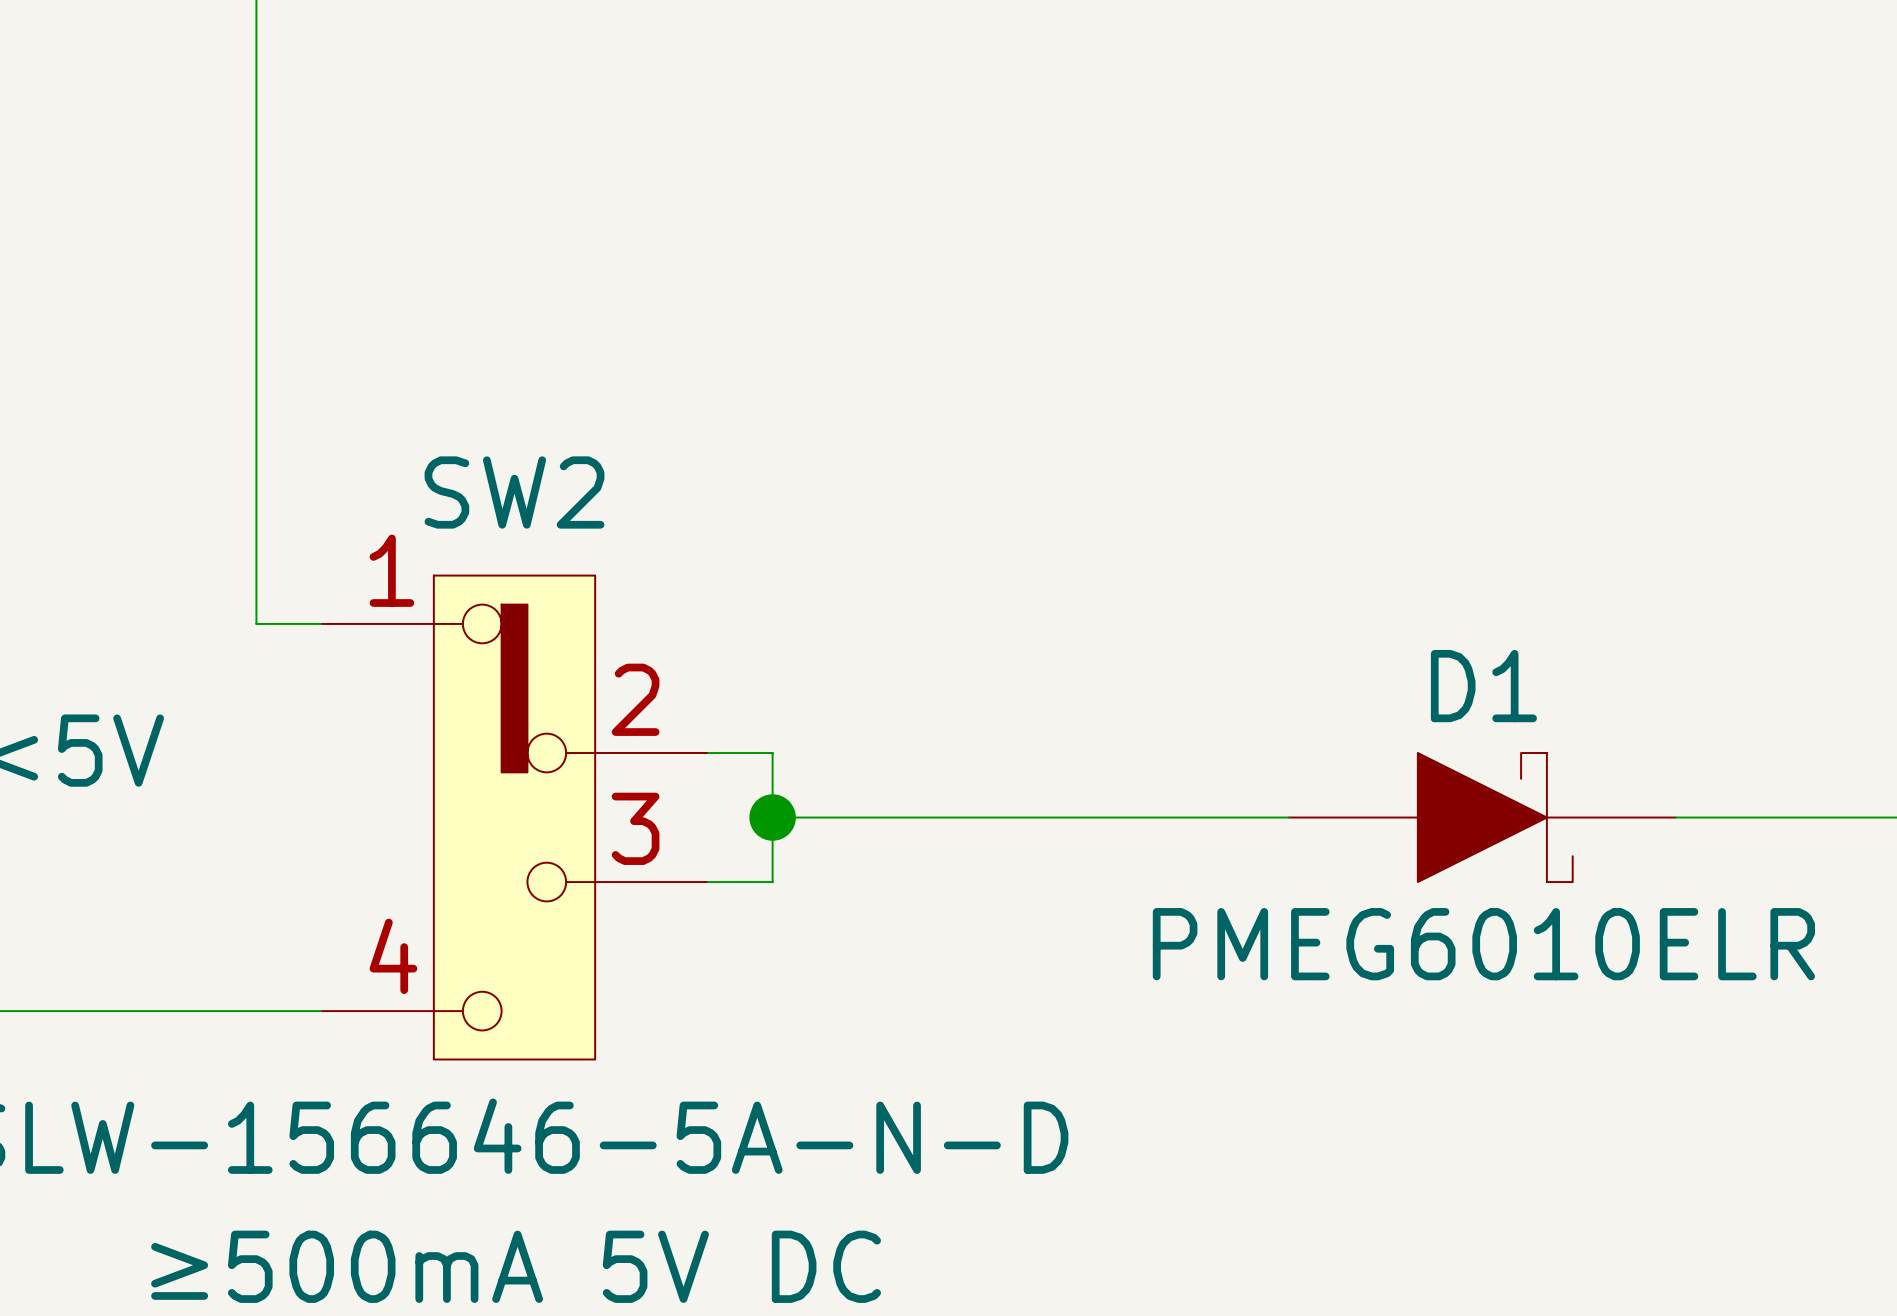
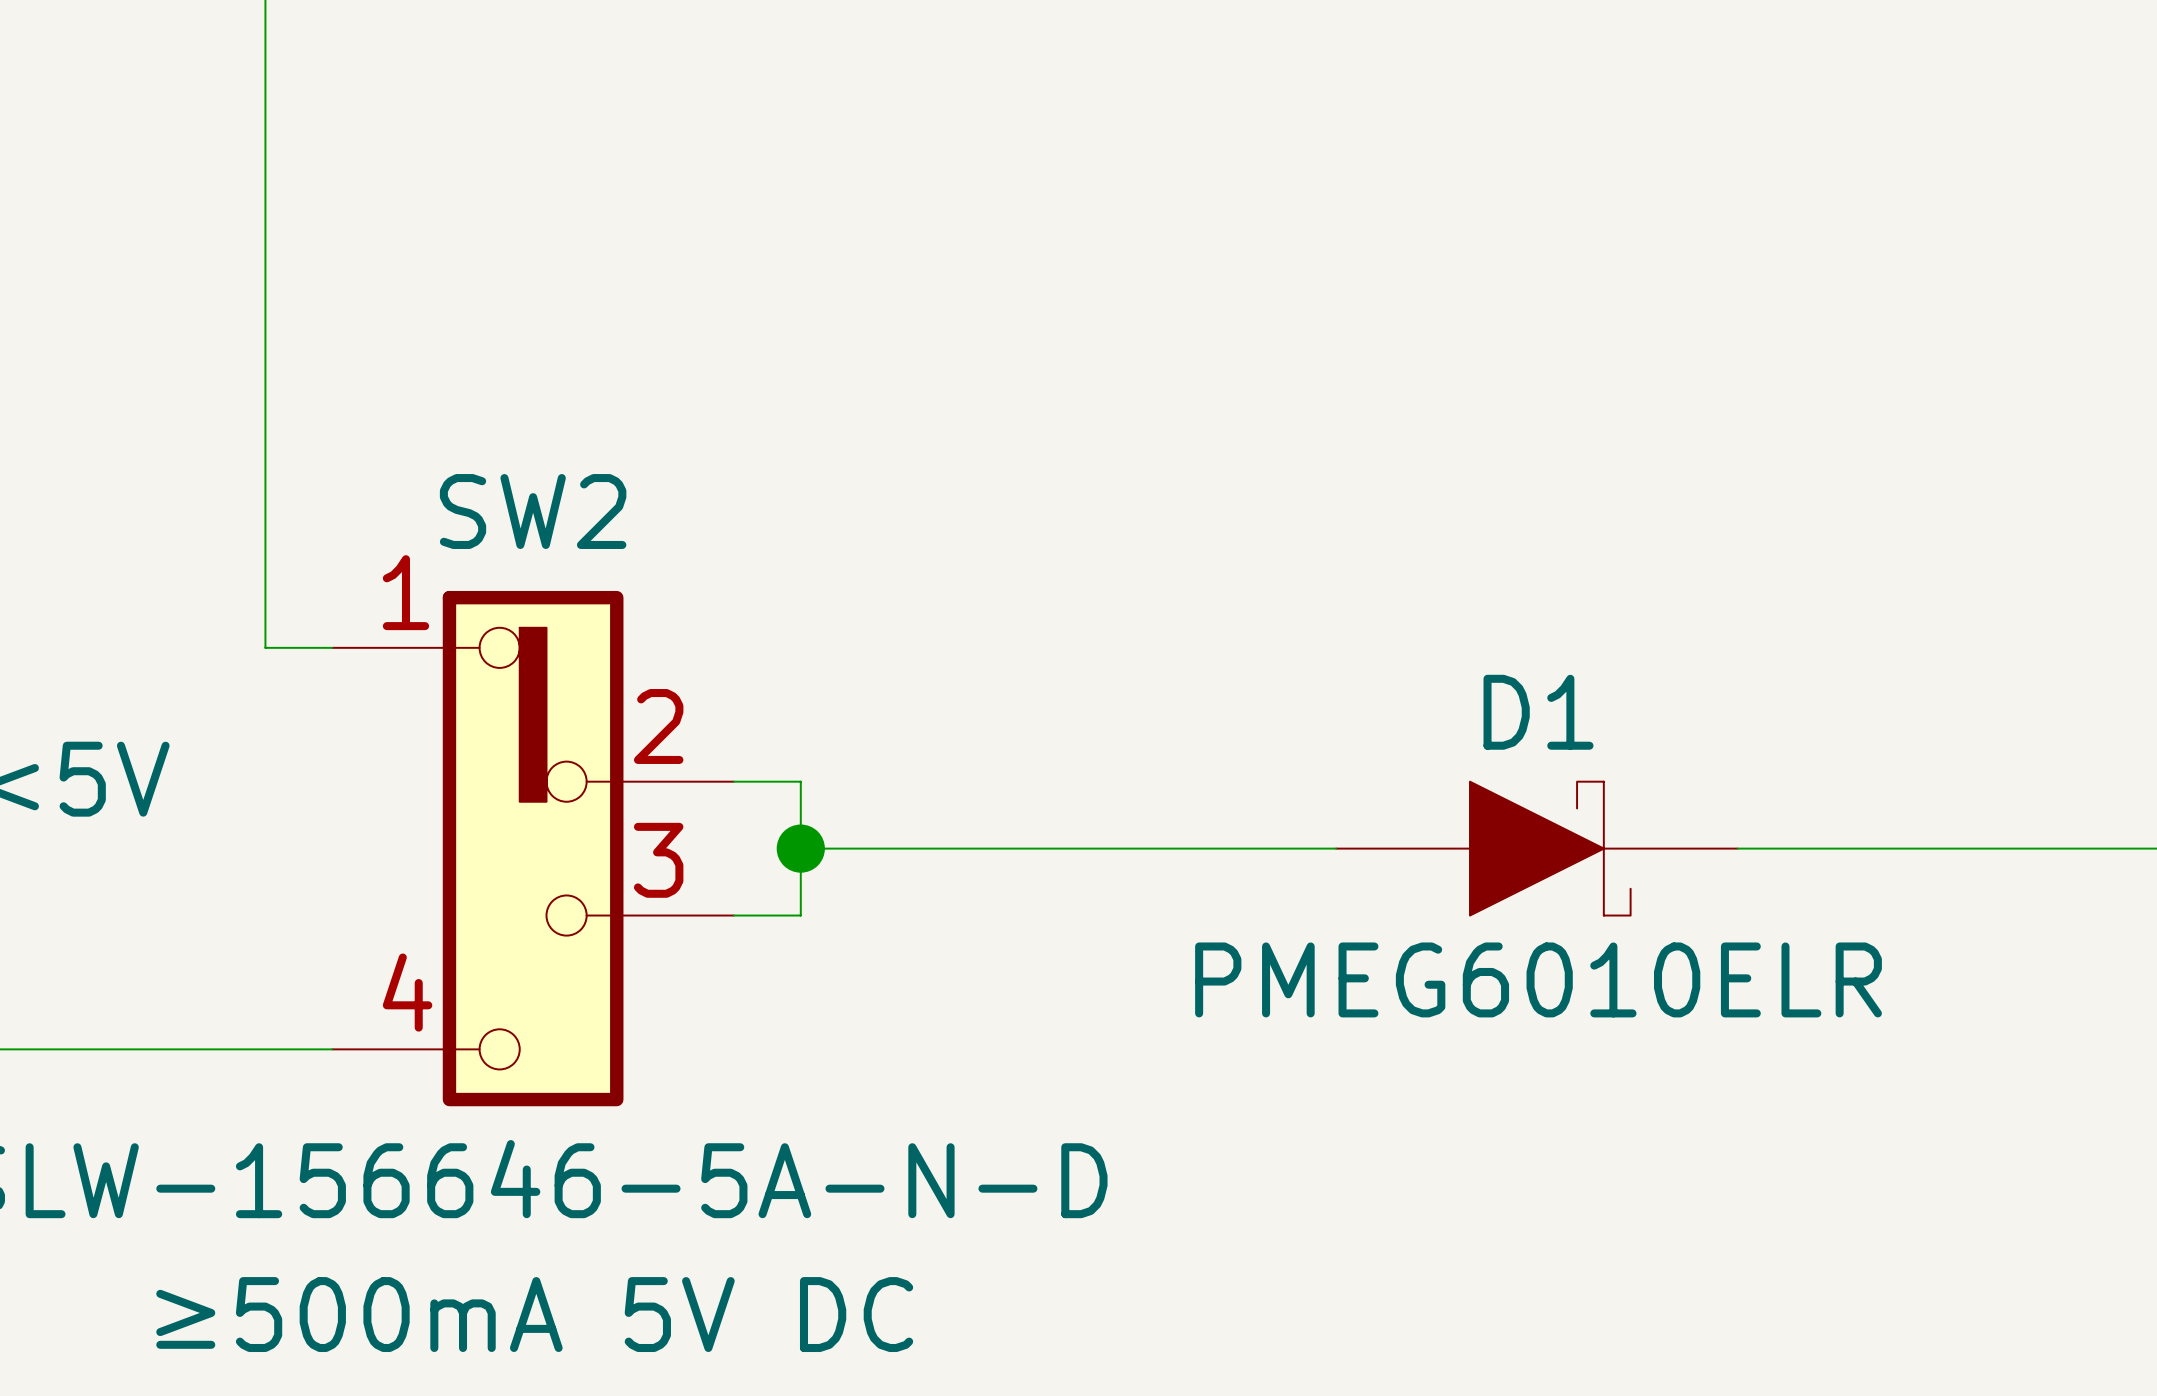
SW2 symbol: [320, 575, 709, 1060] -> [332, 590, 734, 1107]

